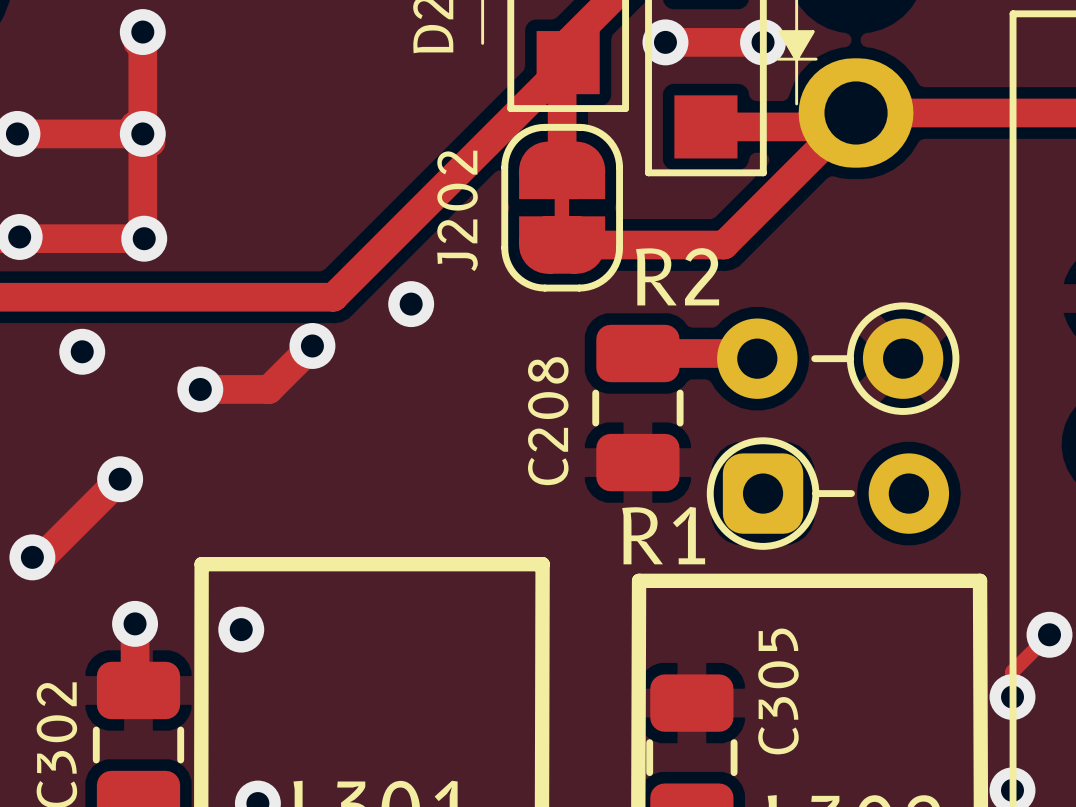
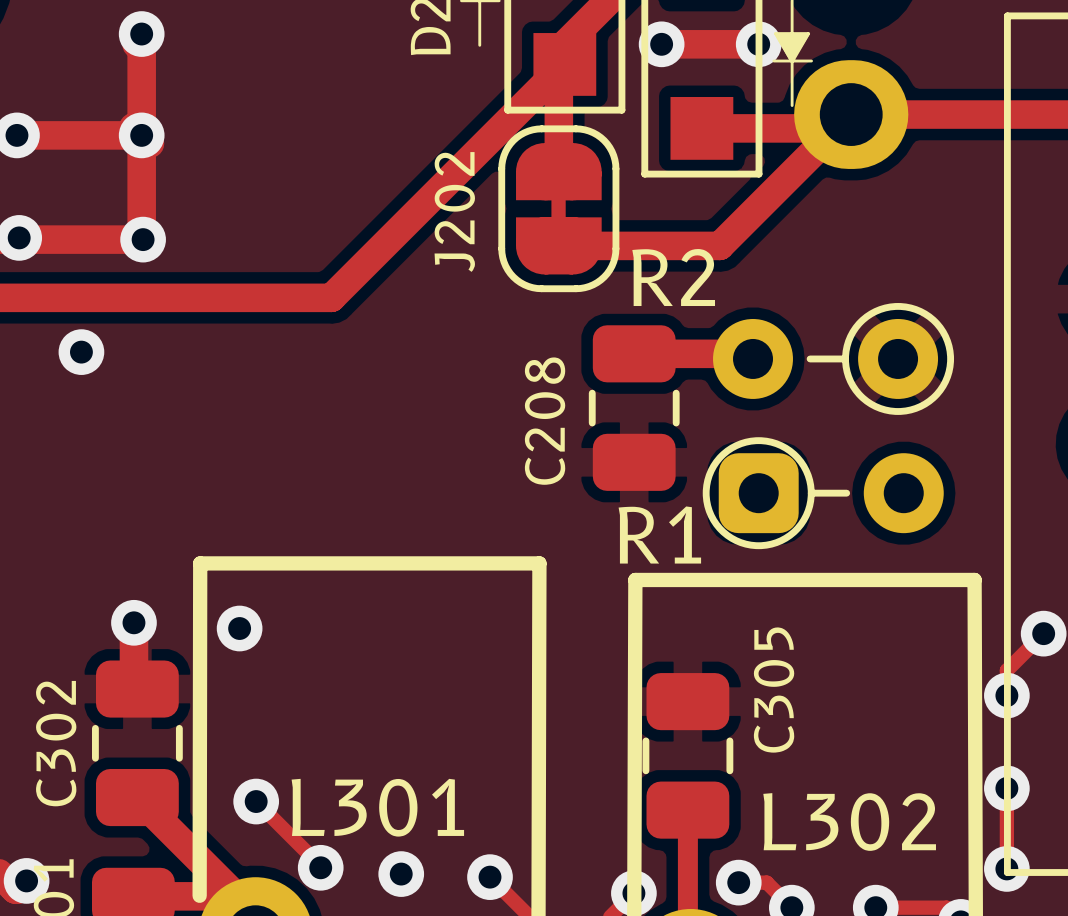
via: (411, 304) -> none
track: (312, 345) (268, 389) (200, 389) -> none
via: (312, 345) -> none
via: (200, 389) -> none
track: (120, 479) (41, 557) (32, 557) -> none
via: (120, 479) -> none
via: (32, 557) -> none

